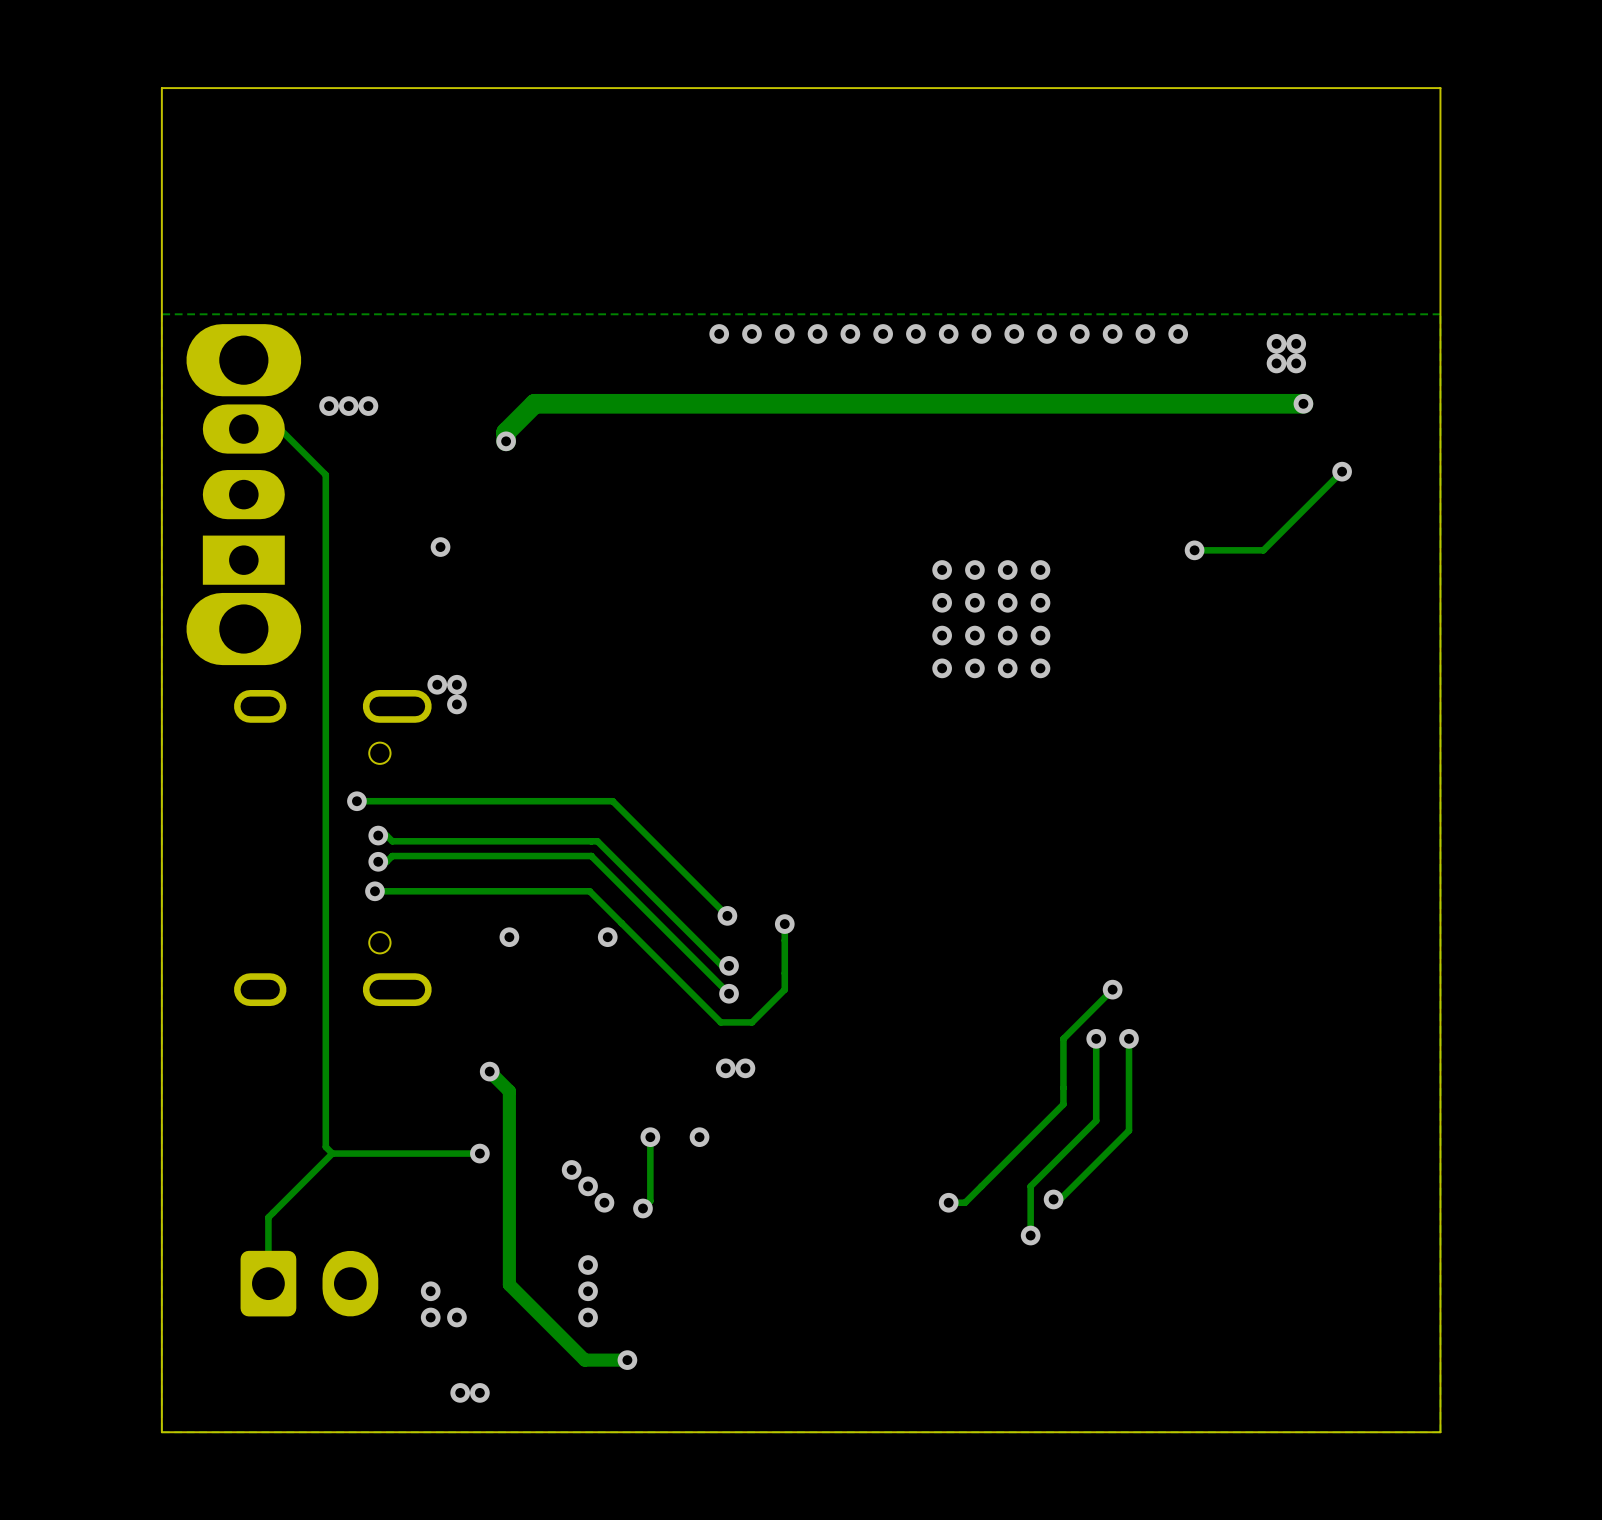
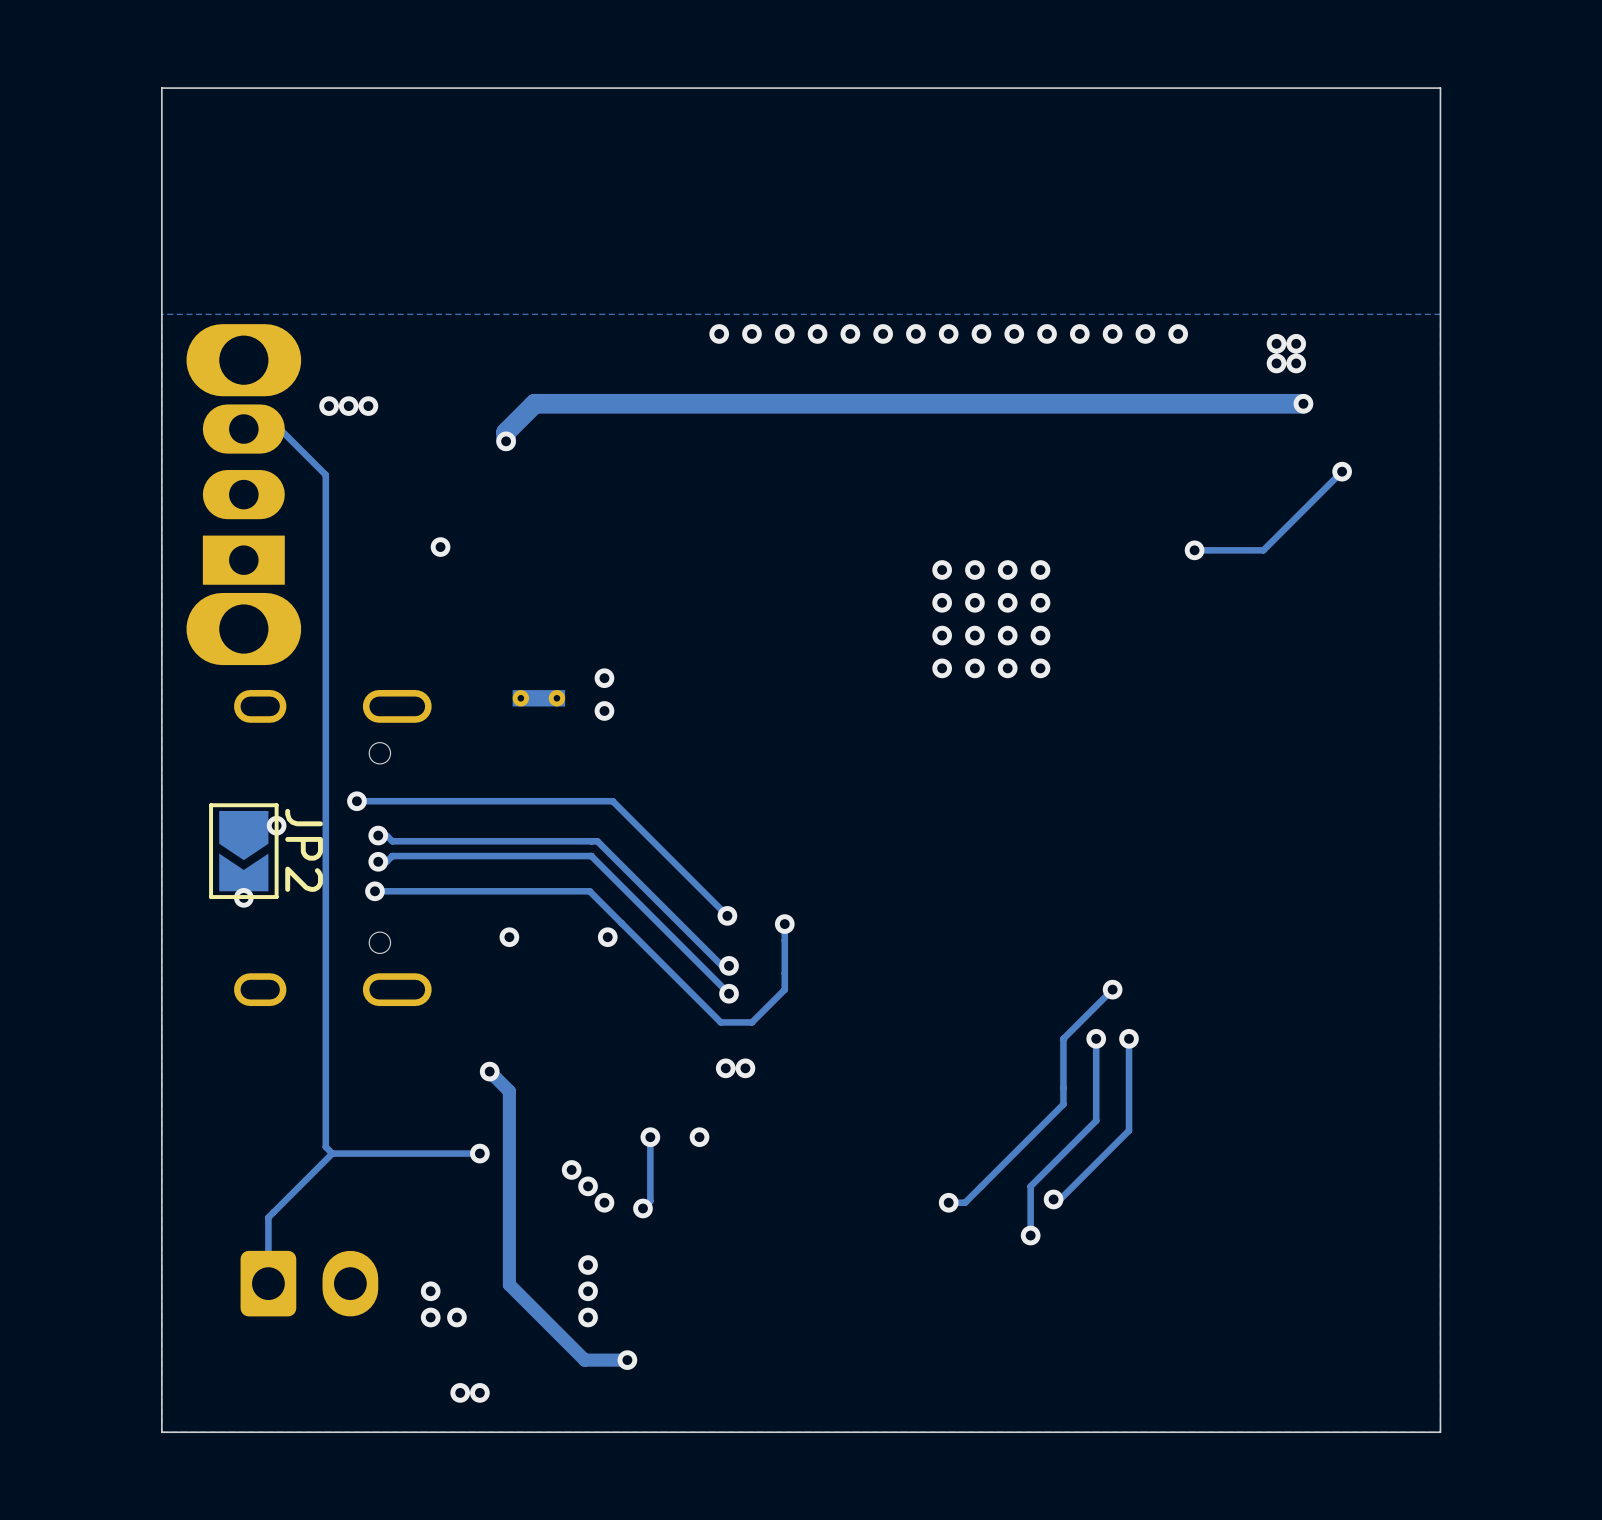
via: none -> (604, 678)
via: (437, 684) -> none
via: (456, 684) -> none
part: none -> (538, 698)
via: (456, 704) -> none
via: none -> (604, 710)
via: none -> (276, 825)
JP2: none -> (243, 851)
via: none -> (243, 897)

